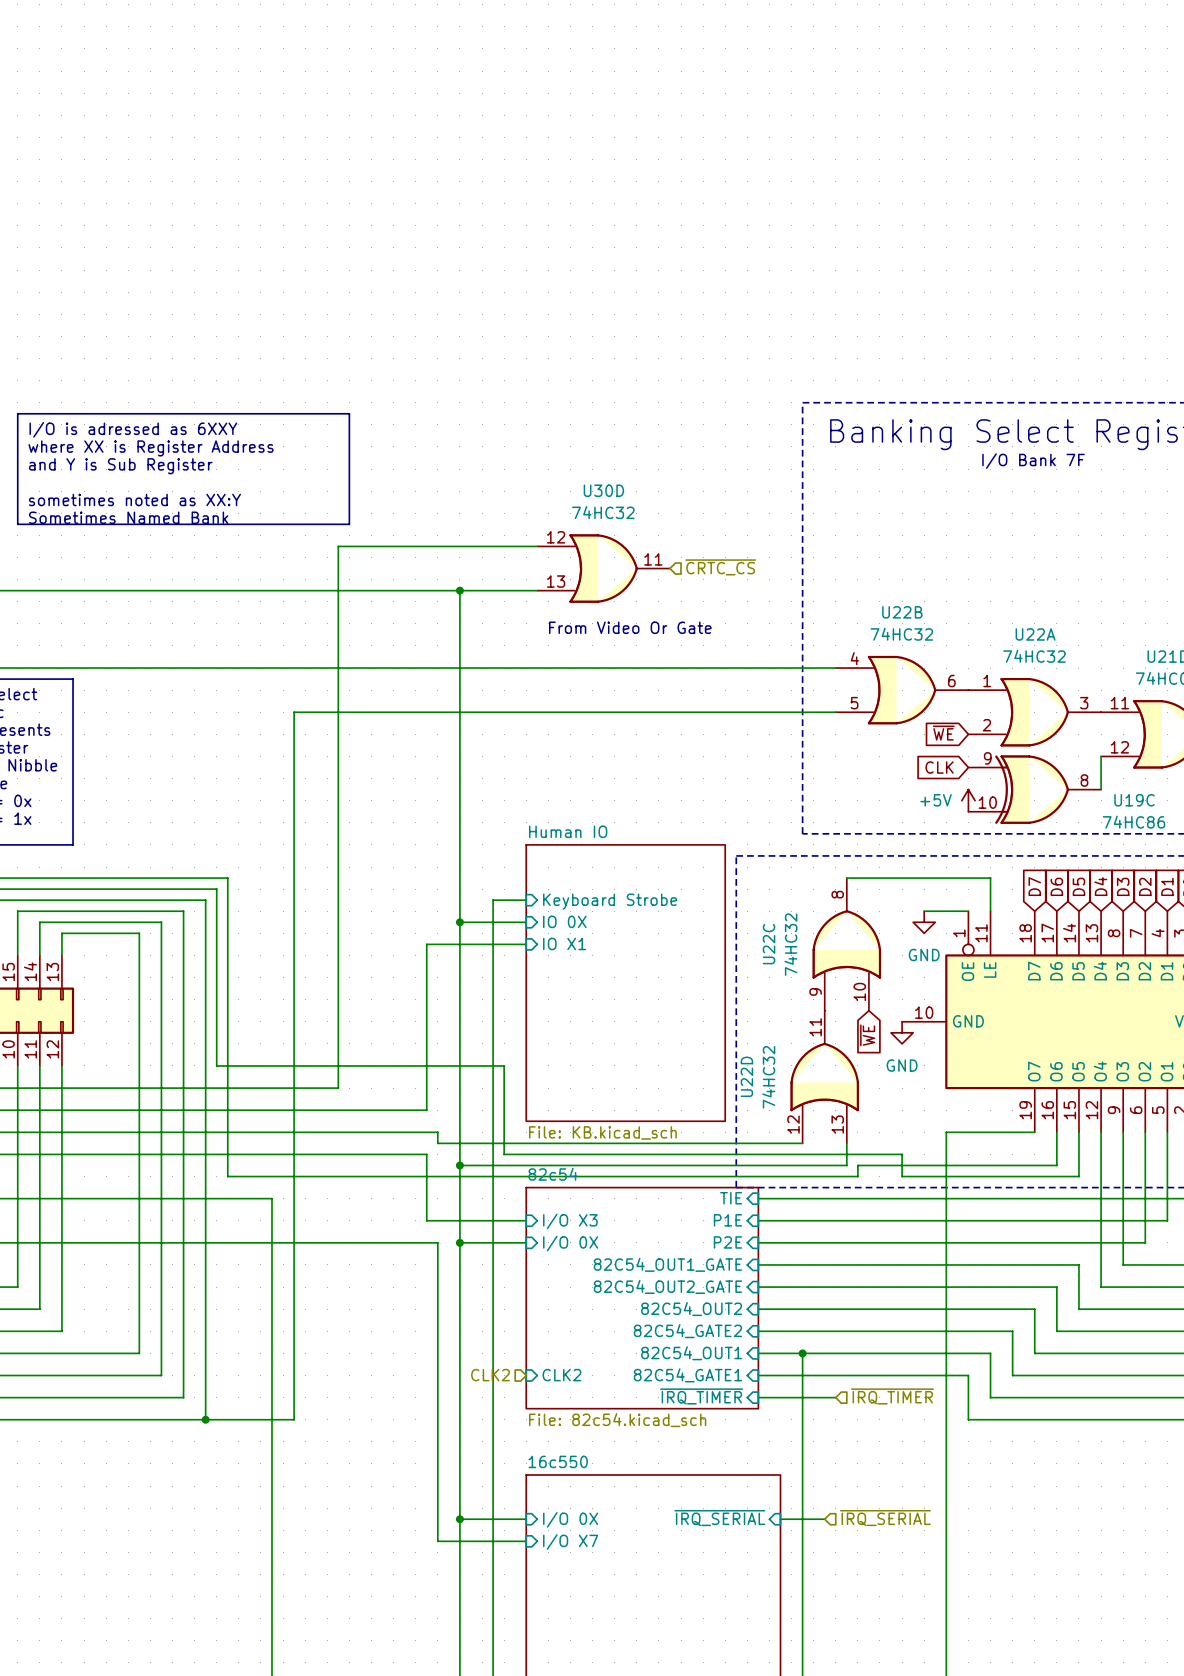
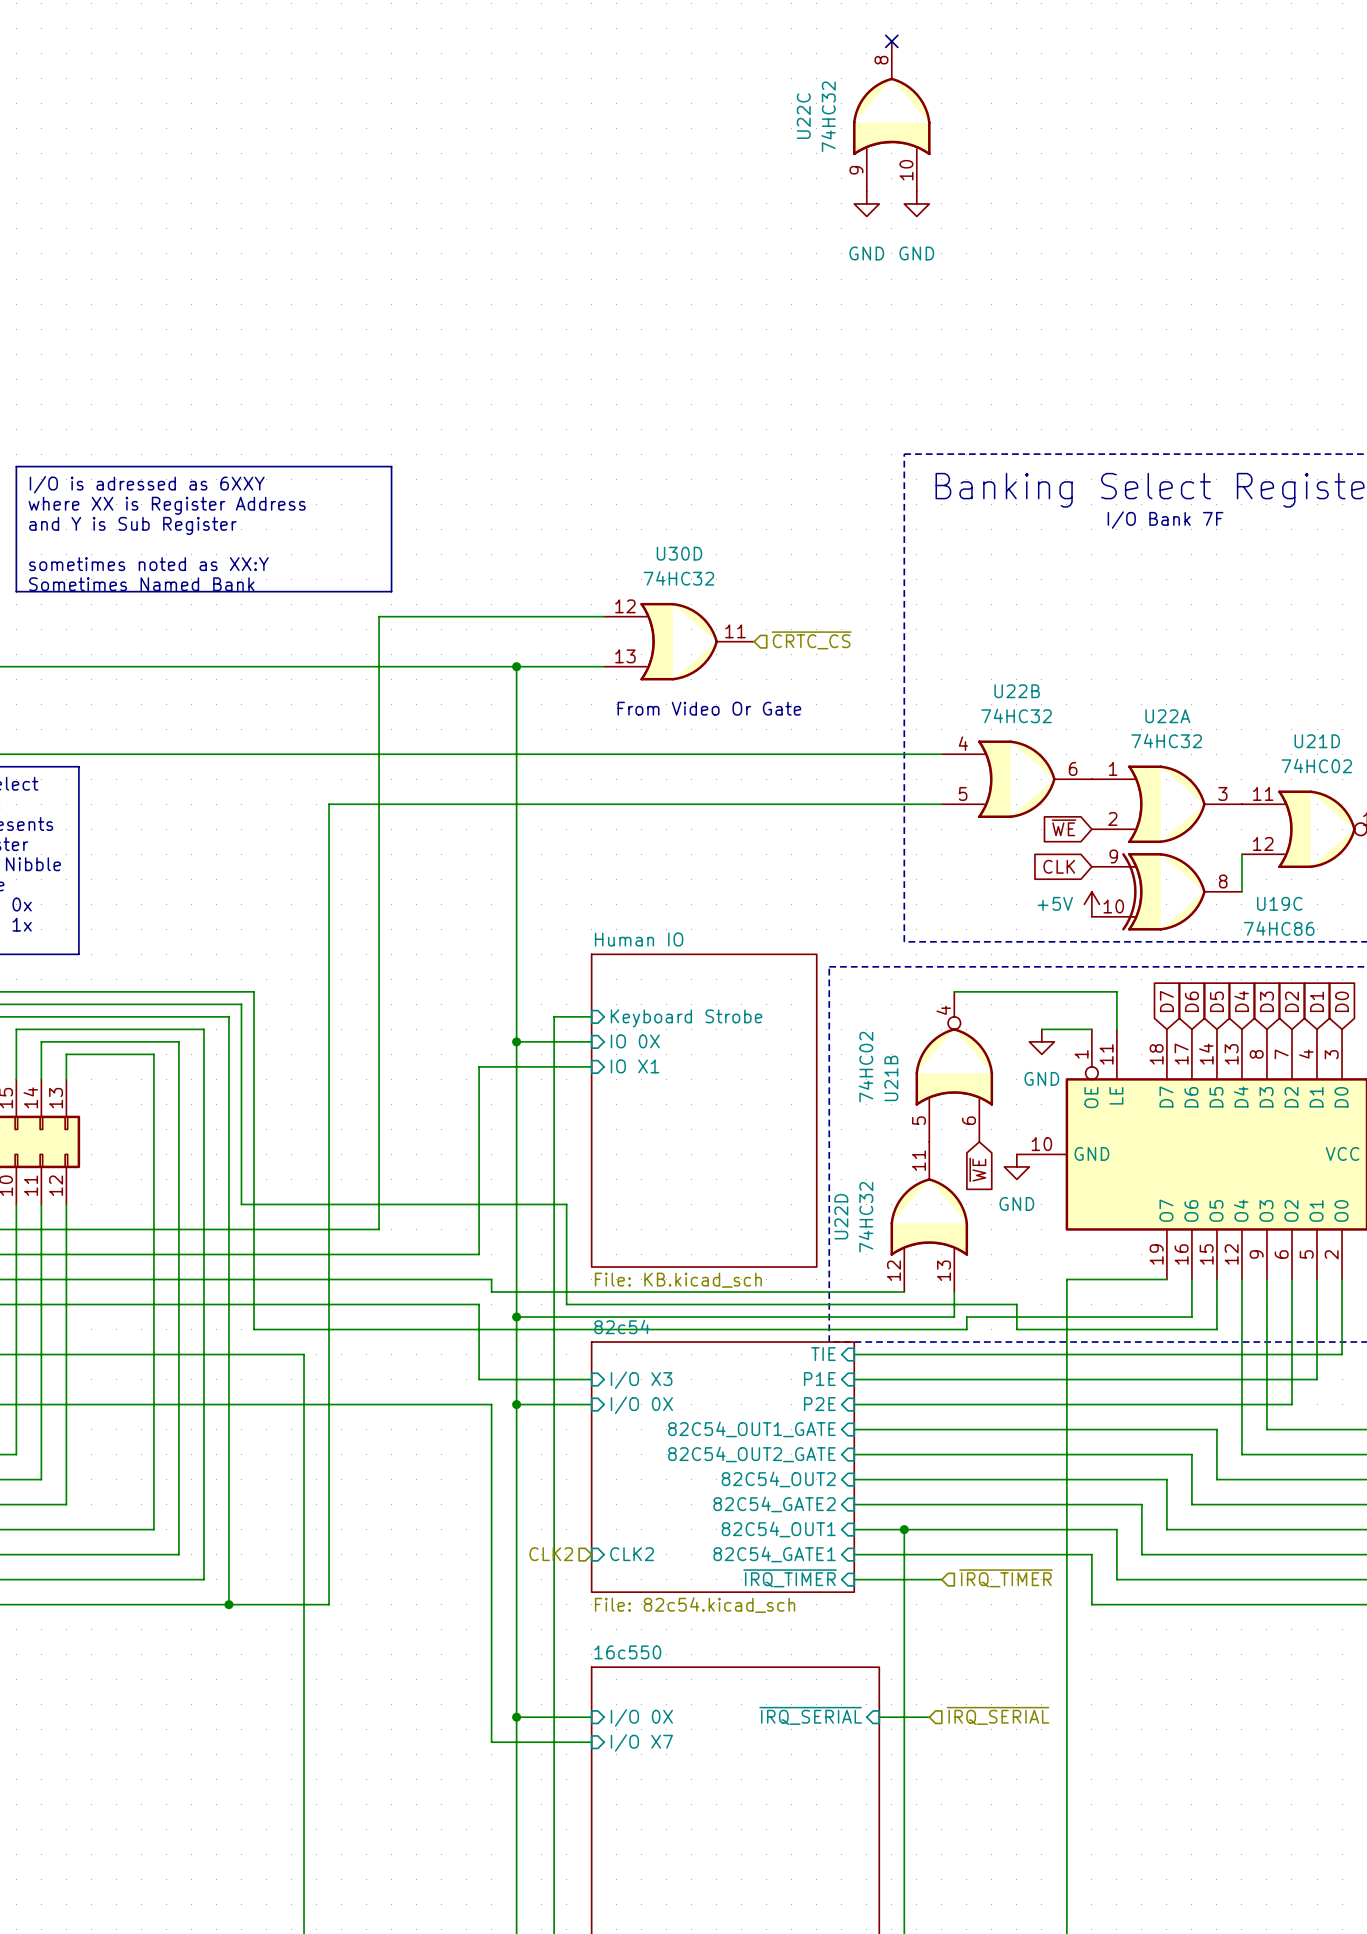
no-connect mark: none -> (891, 41)
power symbol: none -> GND (866, 203)
power symbol: none -> GND (916, 203)
U22C position: (846, 944) -> (891, 116)
U21B: none -> 74HC02 (954, 1066)

